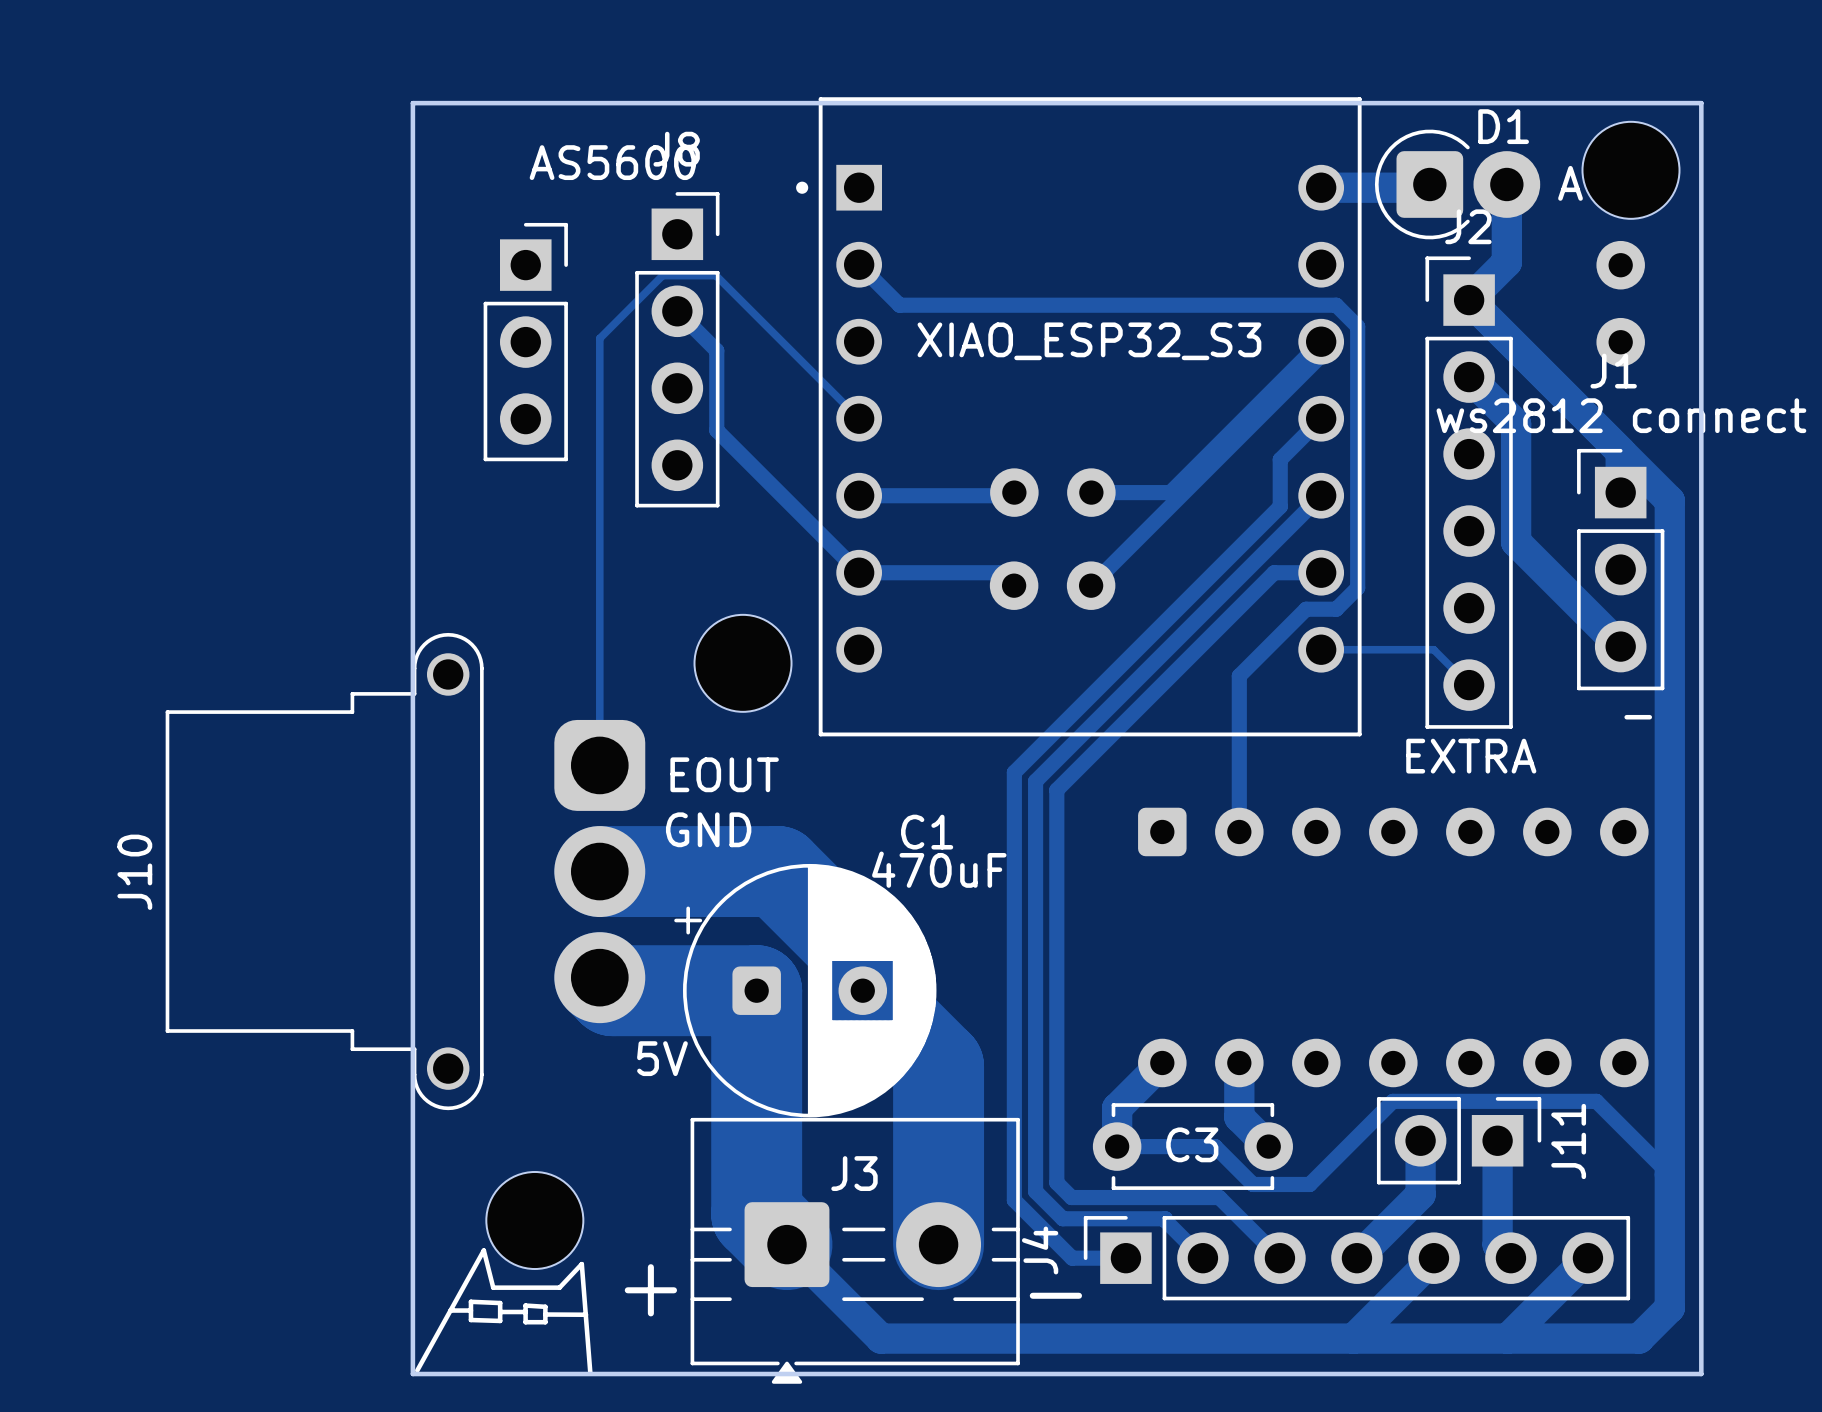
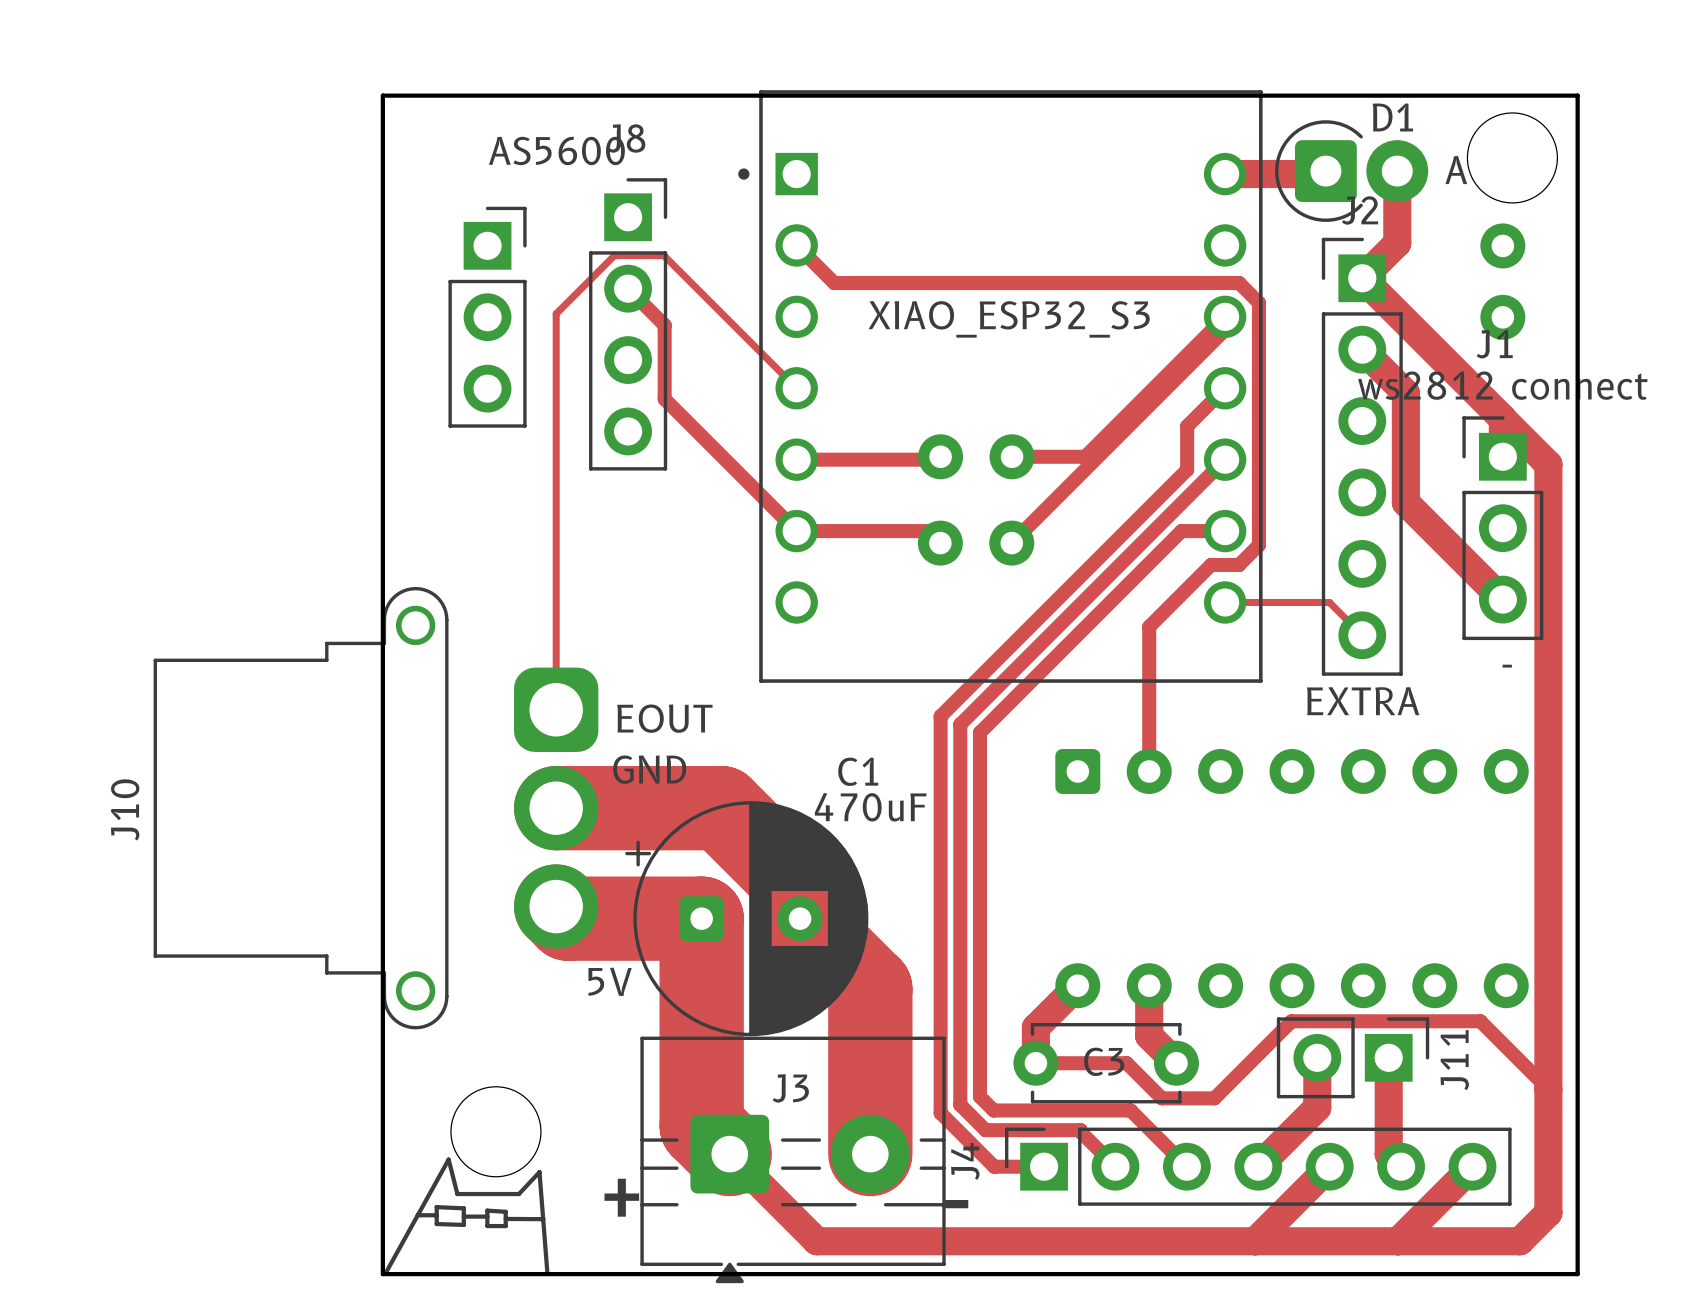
part: (743, 663) -> none

